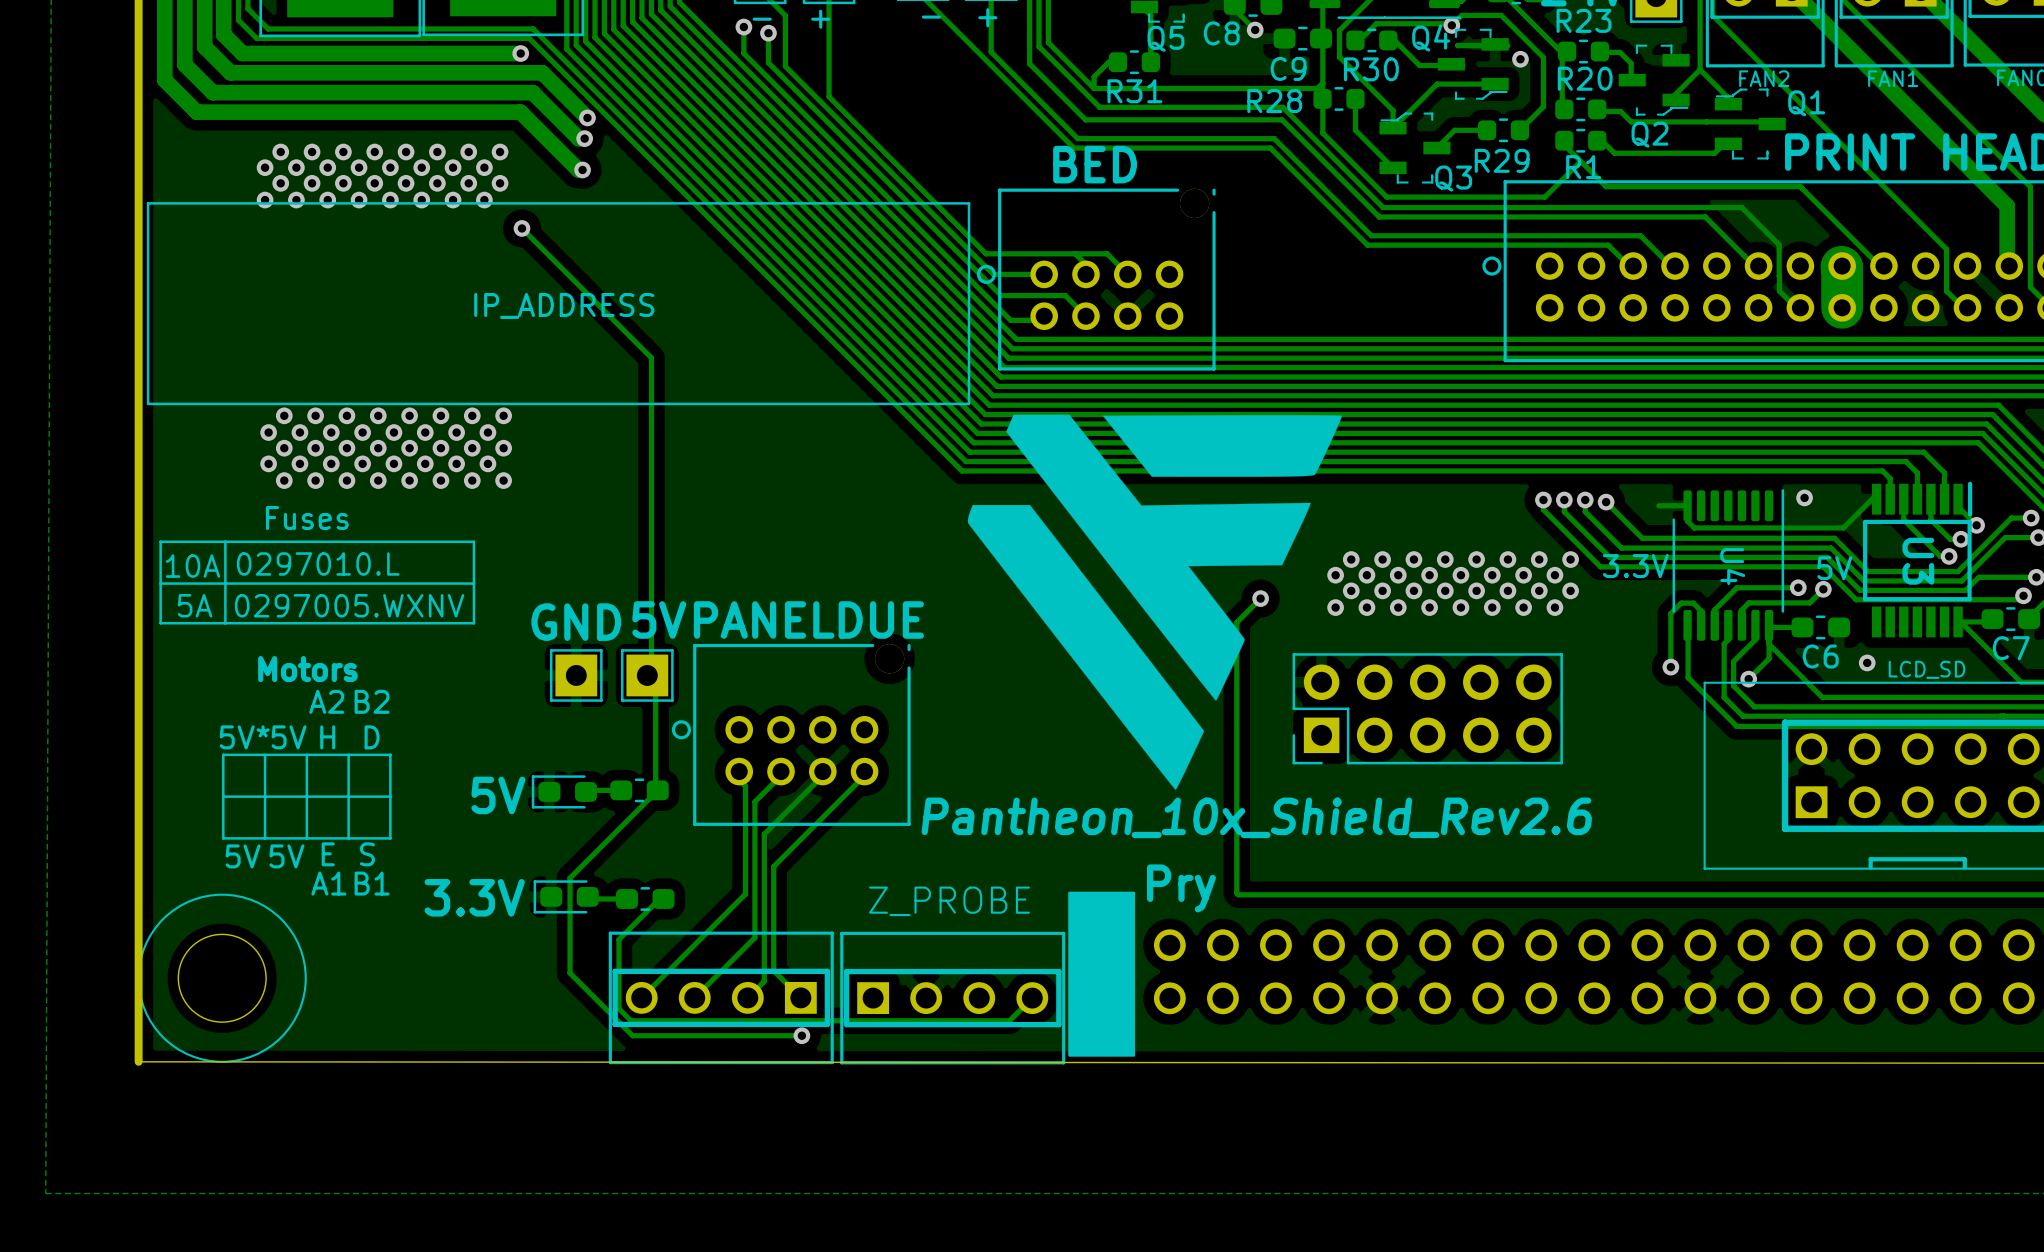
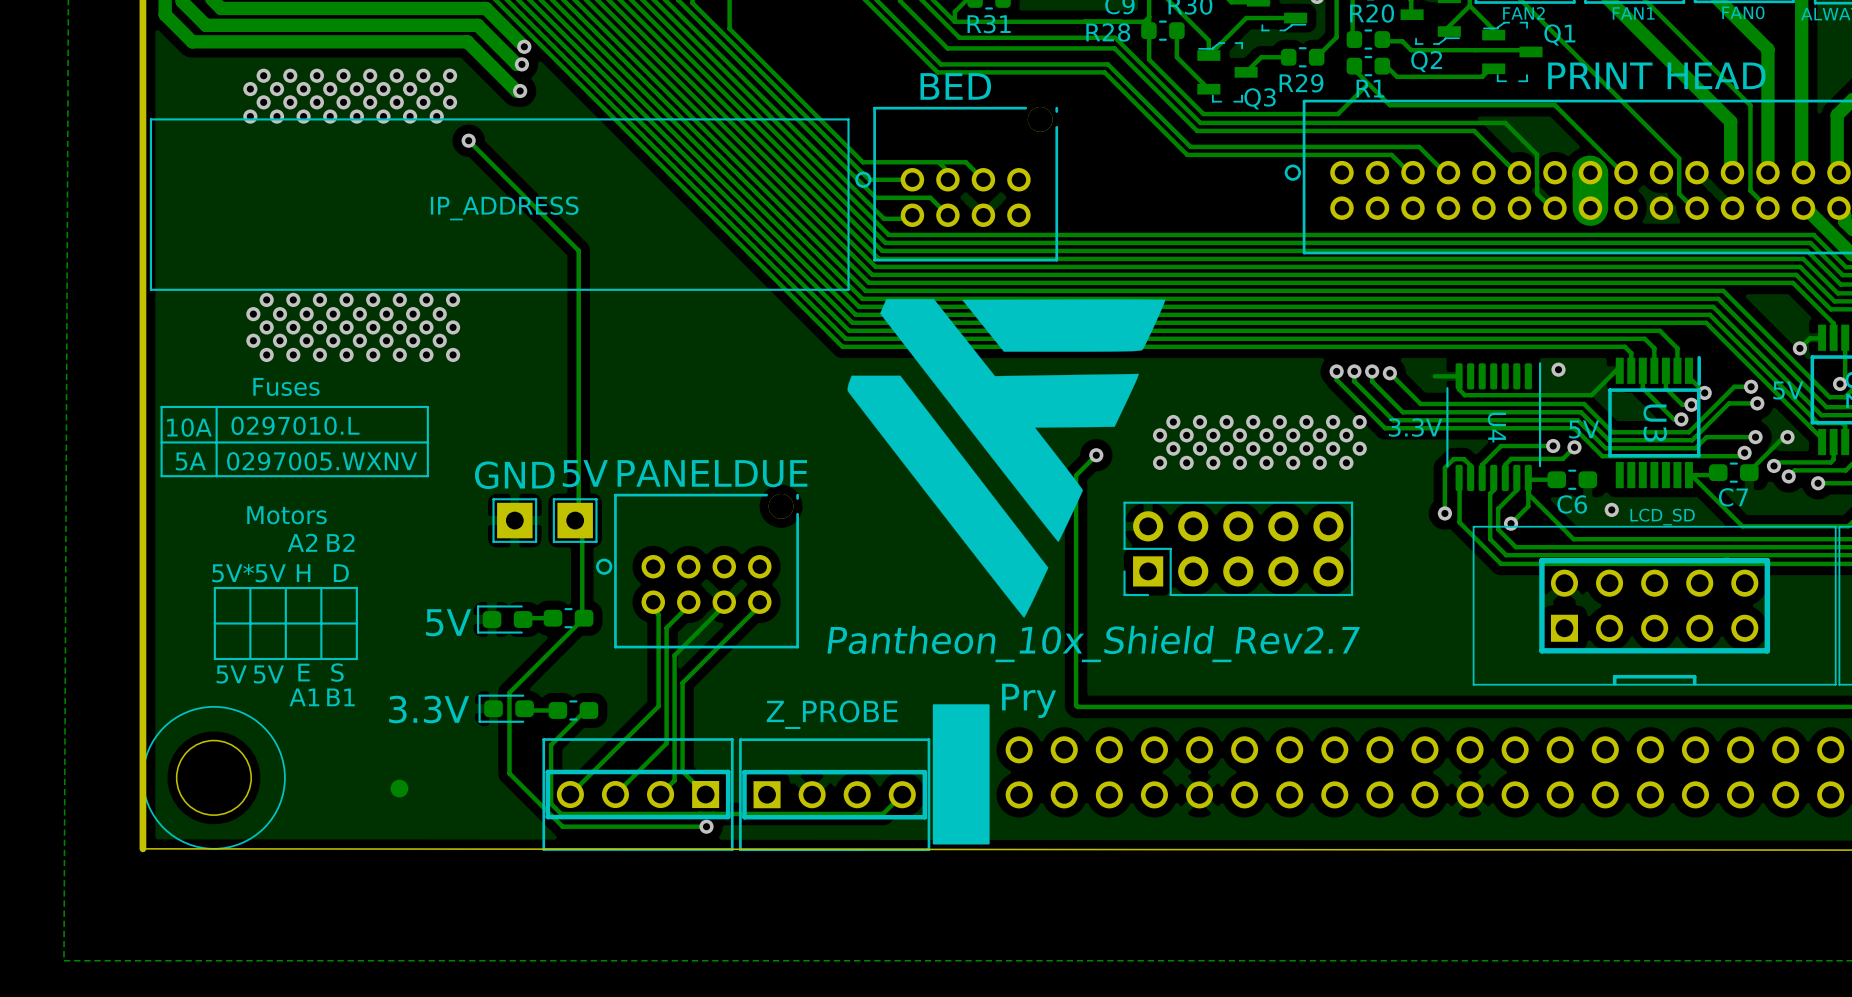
text: Pantheon_10x_Shield_Rev2.6 (1256, 817) -> Pantheon_10x_Shield_Rev2.7 (1093, 644)
part: none -> (399, 788)

